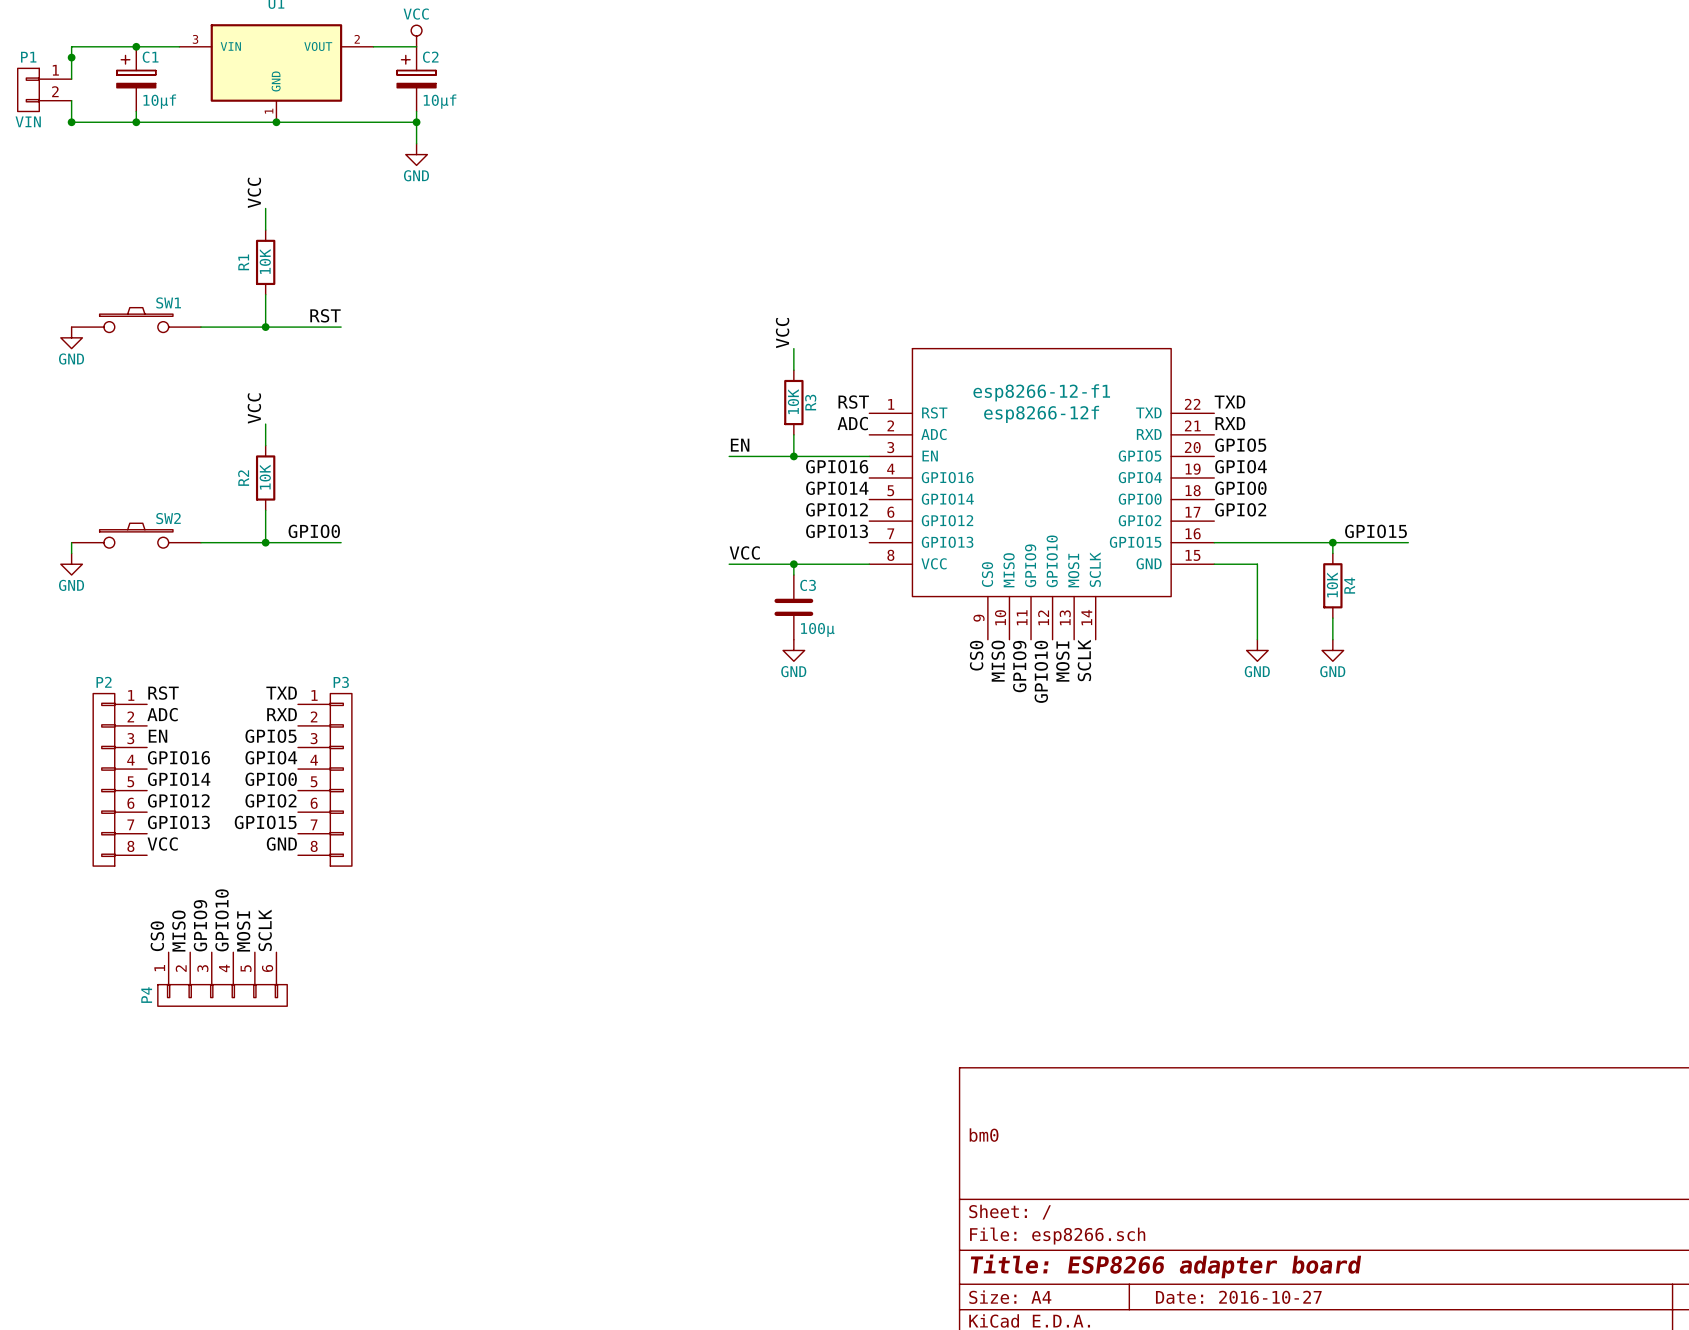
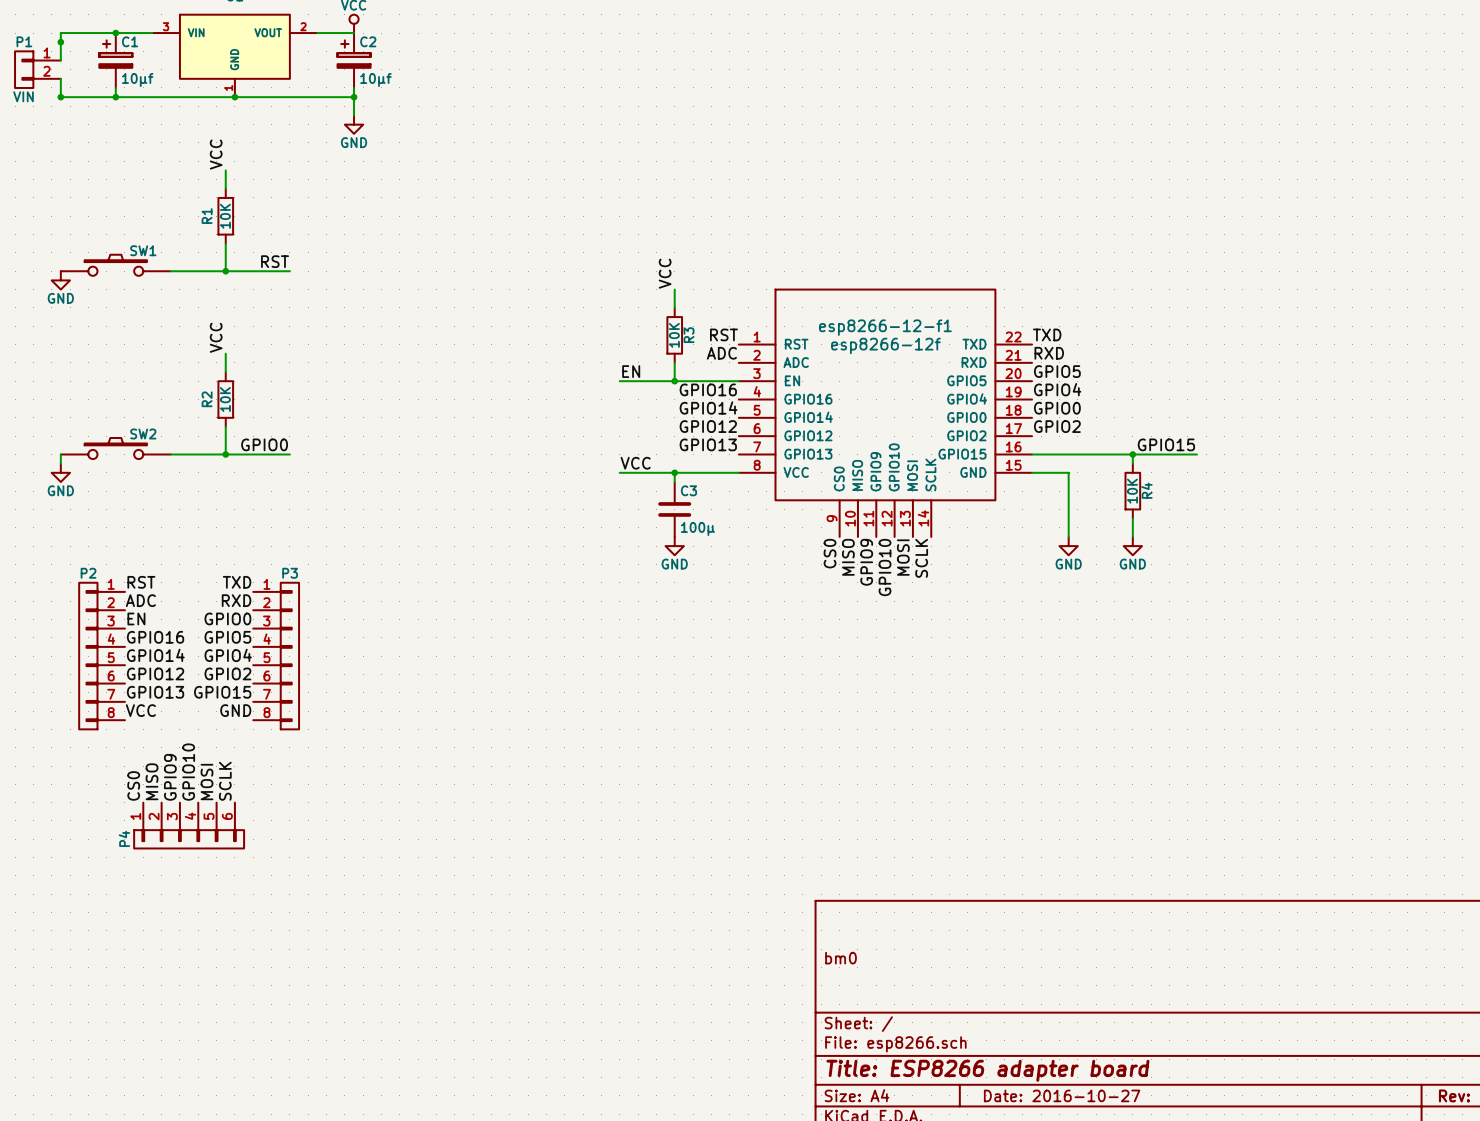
label: GPIO5 (271, 736) -> GPIO0 (227, 618)
label: GPIO4 (271, 757) -> GPIO5 (227, 637)
label: GPIO0 (271, 779) -> GPIO4 (228, 655)

